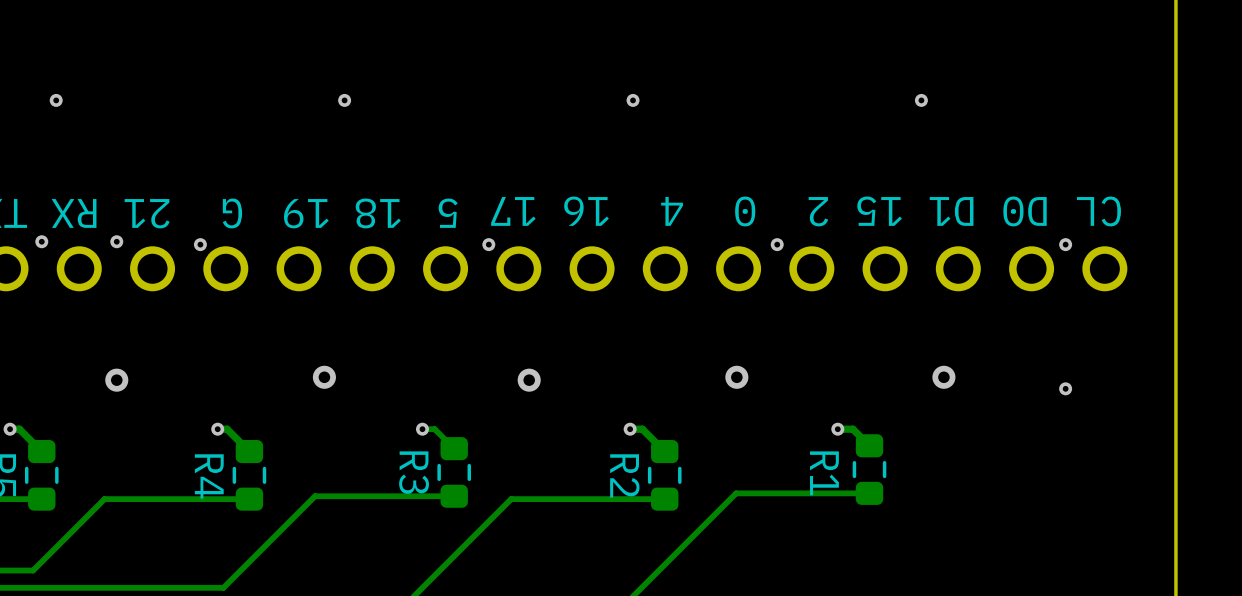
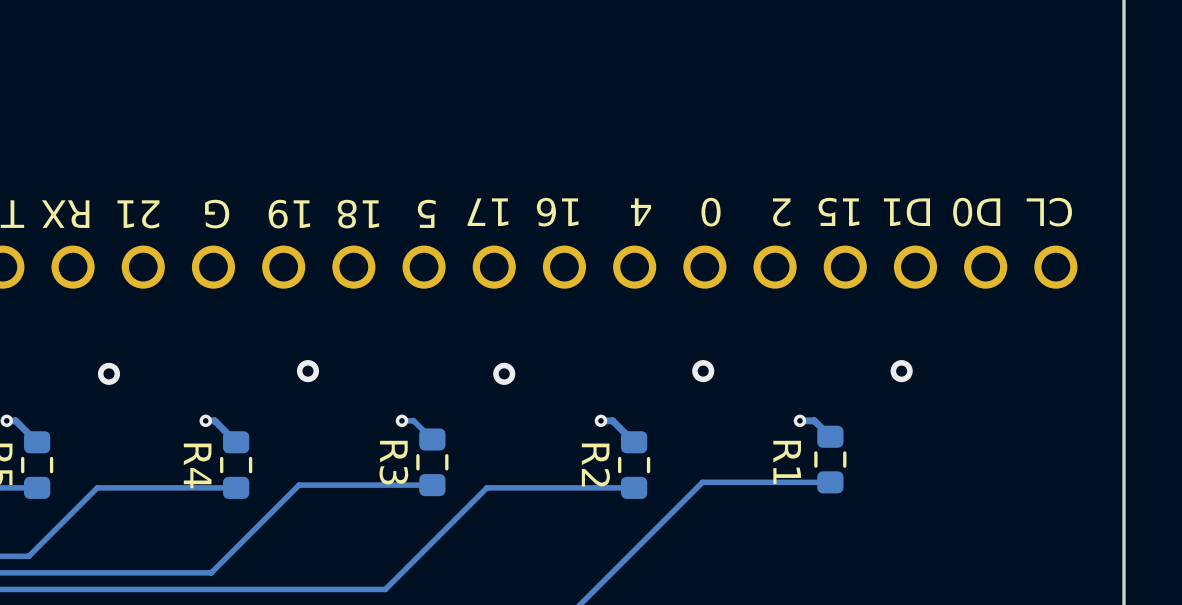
via: (56, 100) -> none
via: (344, 100) -> none
via: (633, 100) -> none
via: (921, 100) -> none
via: (41, 241) -> none
via: (116, 241) -> none
via: (200, 244) -> none
via: (488, 244) -> none
via: (777, 244) -> none
via: (1065, 244) -> none
via: (1065, 388) -> none

